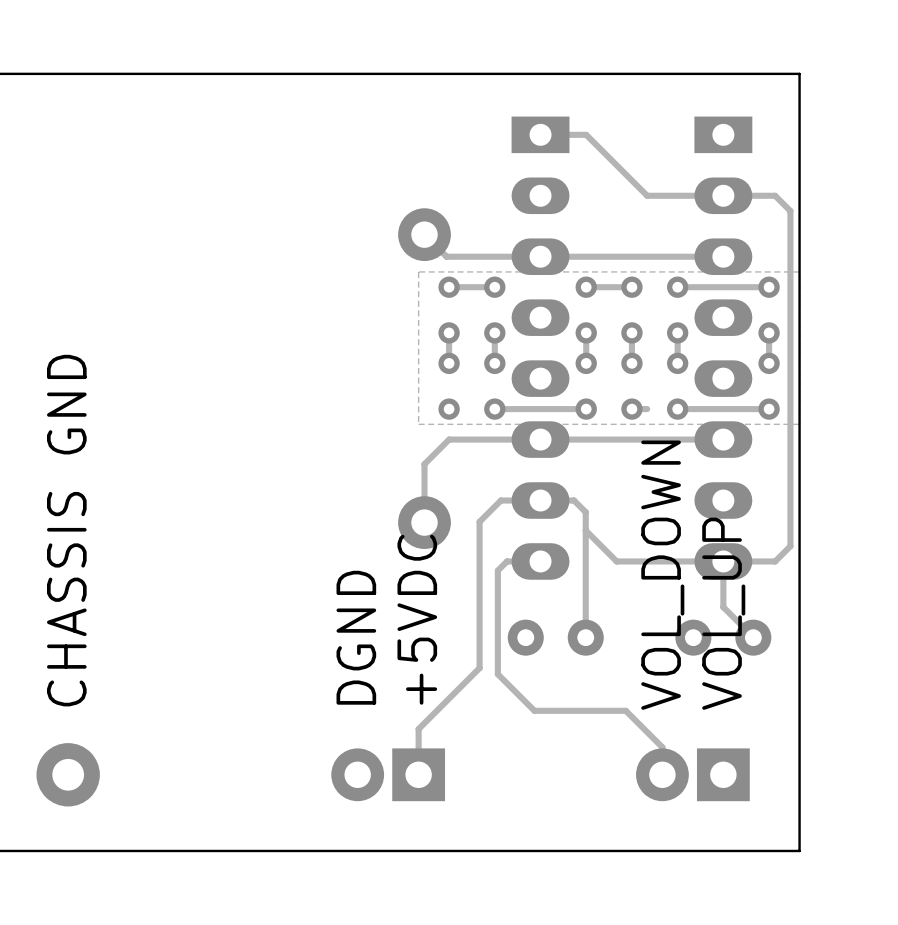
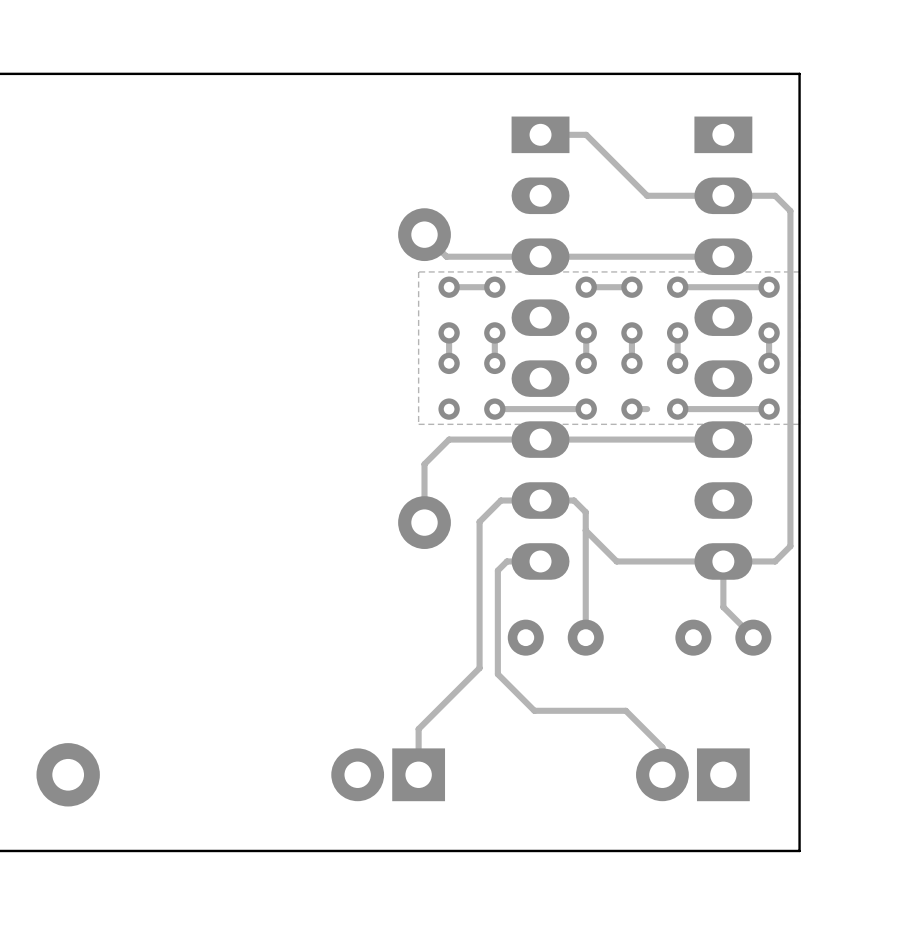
text: CHASSIS GND (66, 530) -> none
text: VOL_DOWN (662, 575) -> none
text: VOL_UP (723, 613) -> none
text: +5VDC (417, 619) -> none
text: DGND (356, 637) -> none

